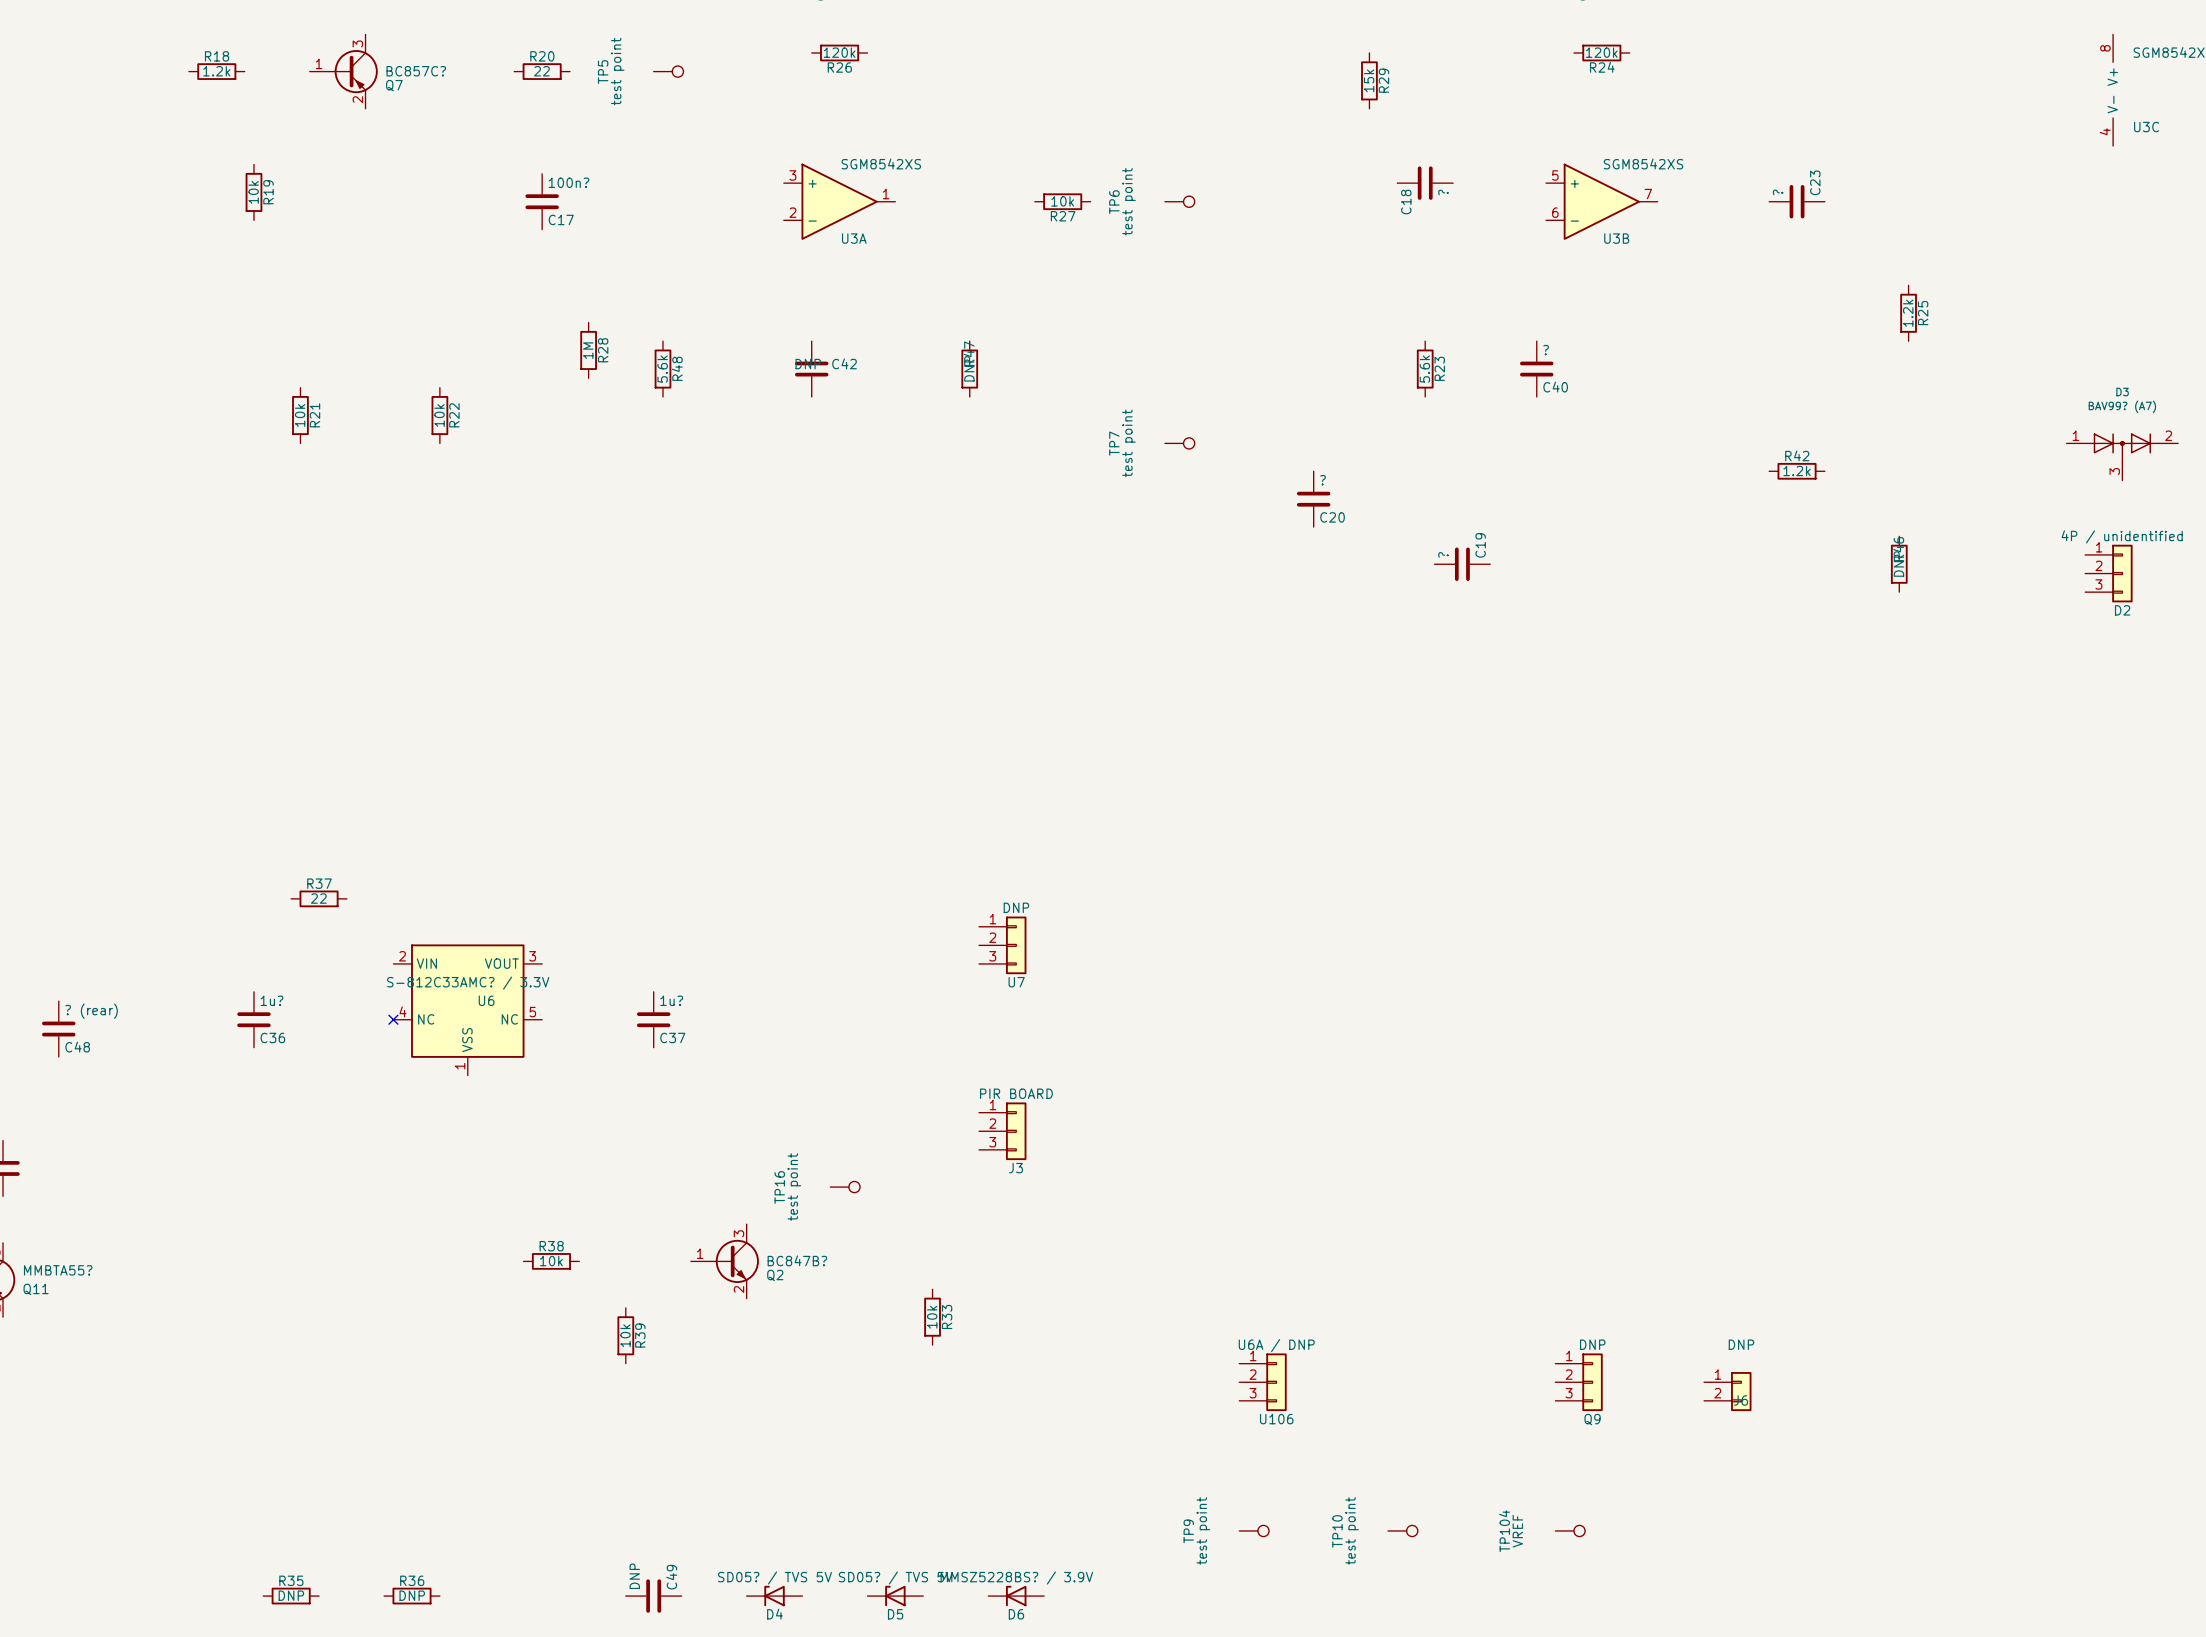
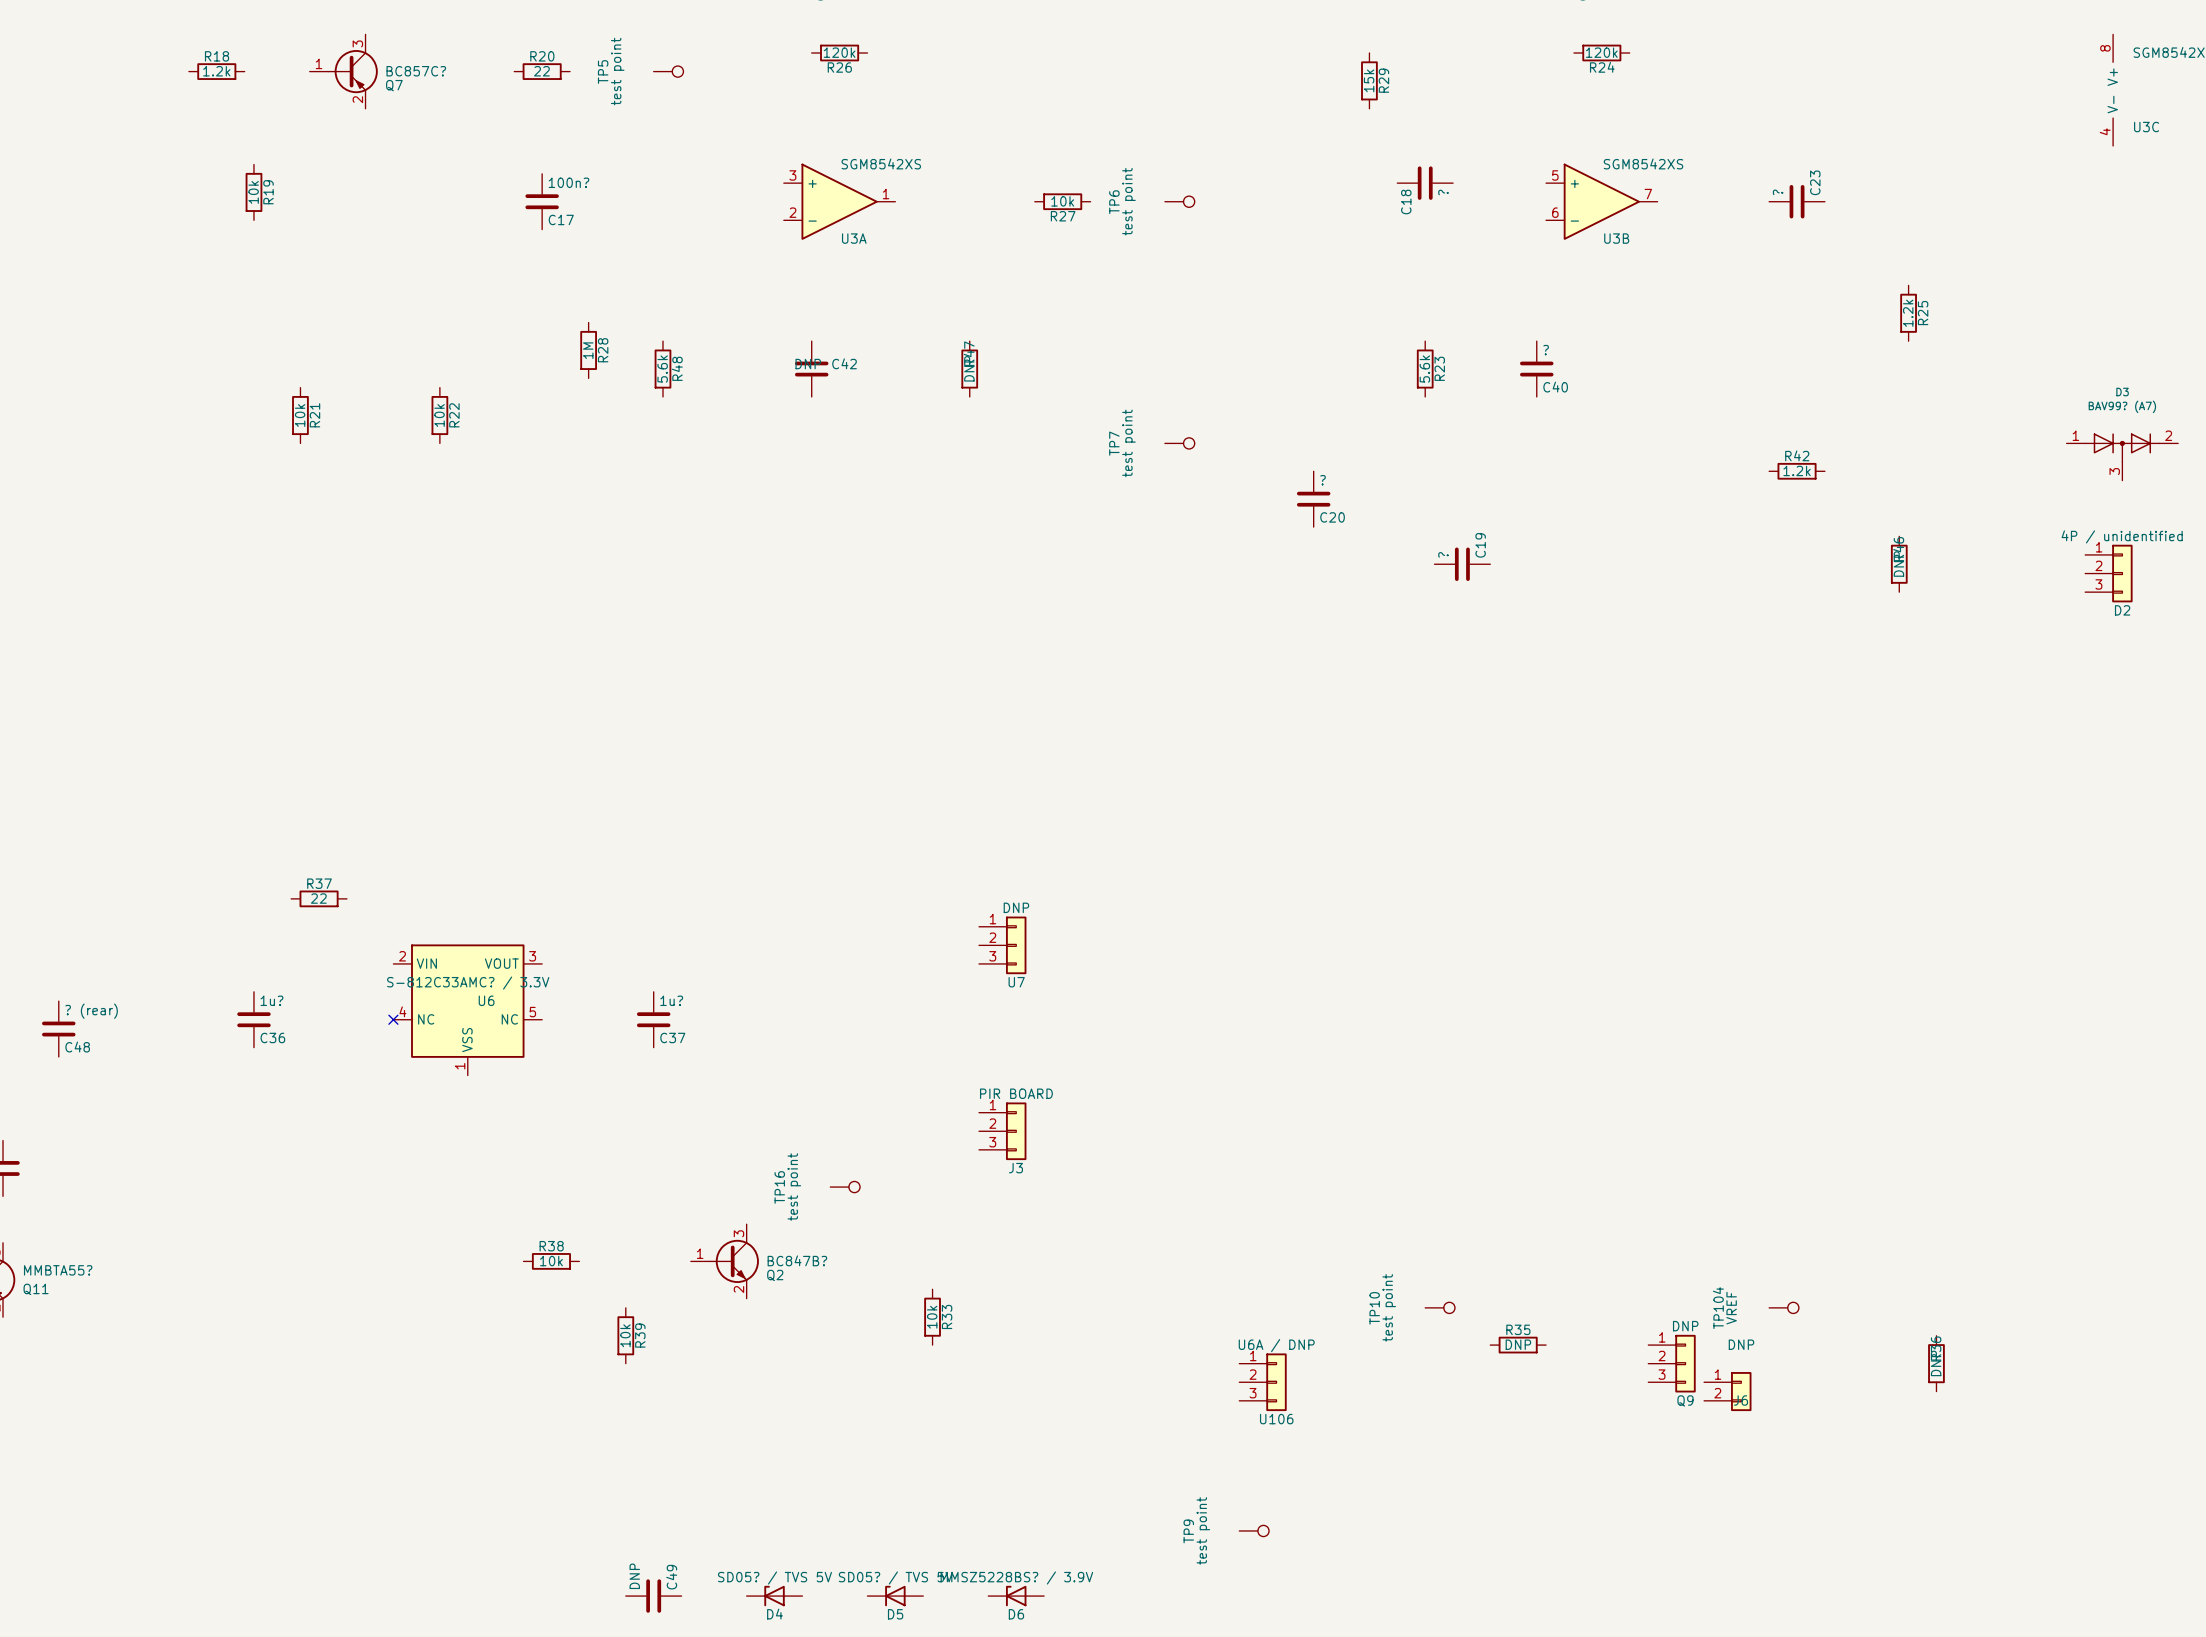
Q9 position: (1579, 1382) -> (1672, 1363)
TP10 position: (1402, 1530) -> (1440, 1307)
TP104 position: (1570, 1530) -> (1784, 1307)
R35 position: (291, 1596) -> (1518, 1345)
R36 rotation: 0° (412, 1596) -> 90° clockwise (1936, 1363)
R36 position: (412, 1596) -> (1936, 1363)

